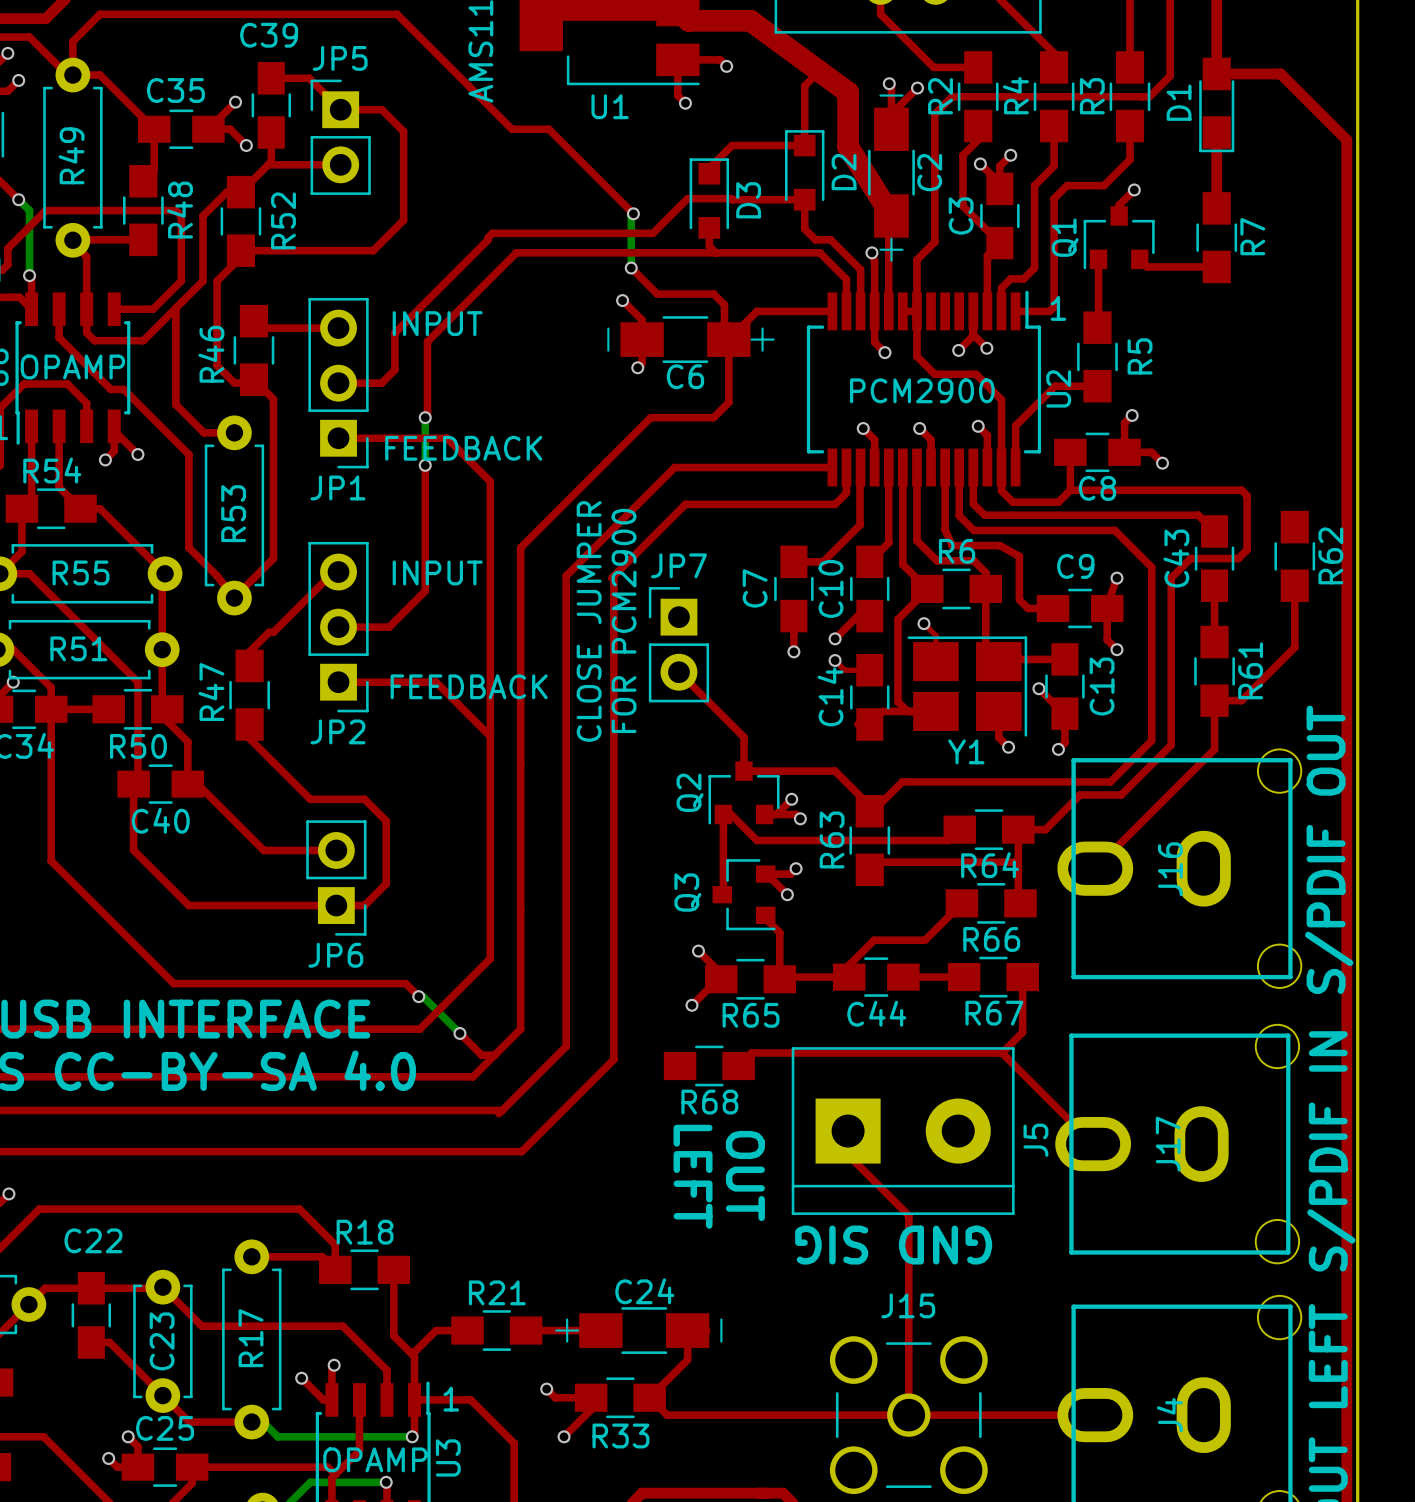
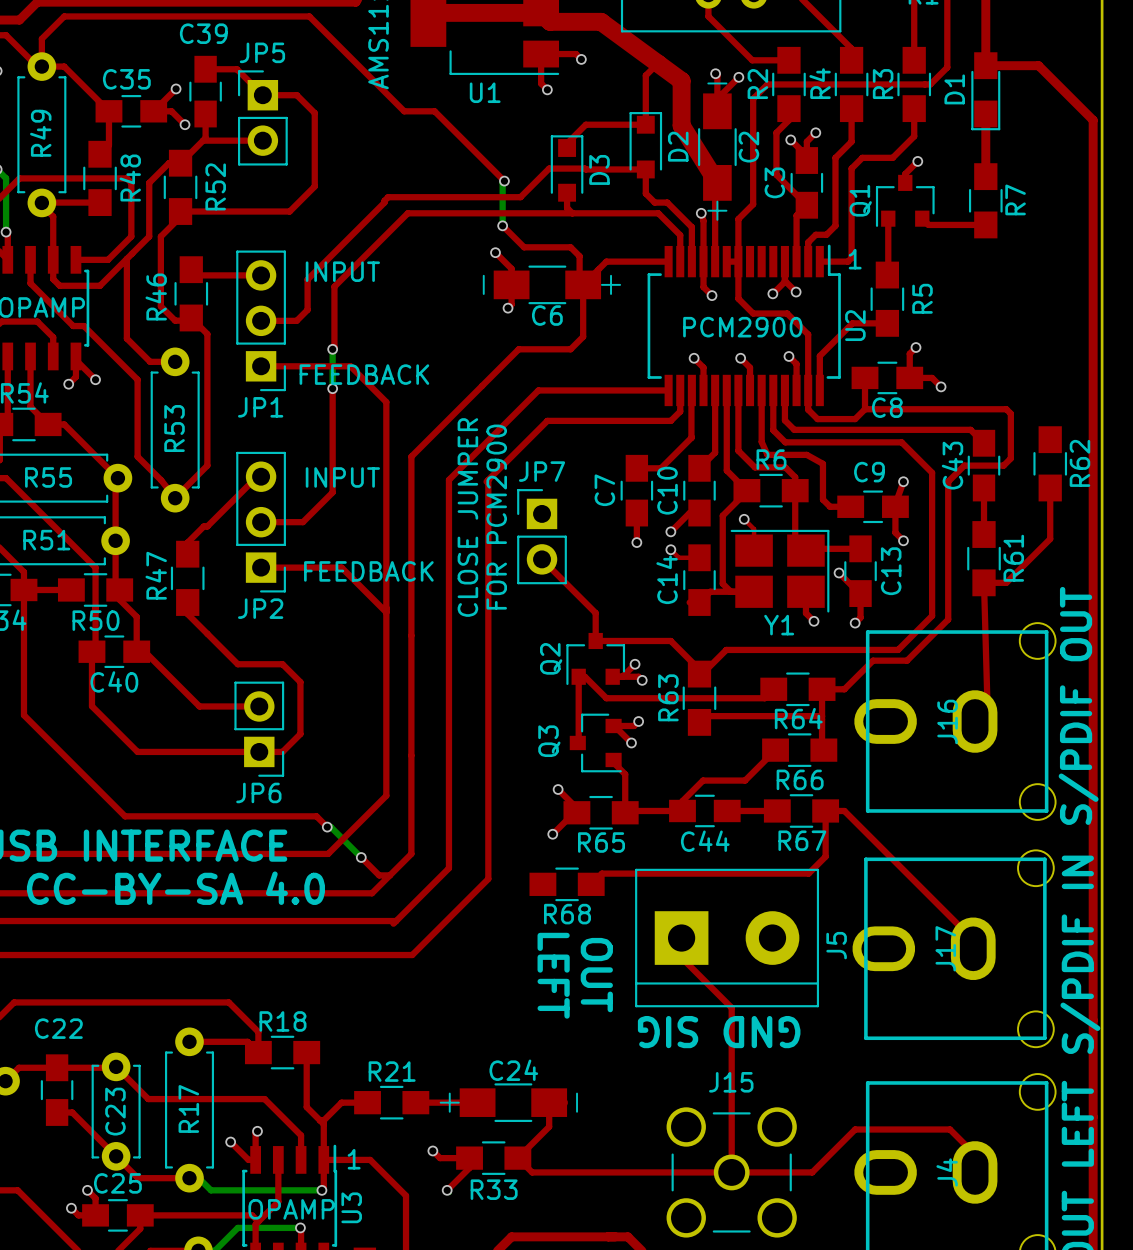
top track: (1214, 700) (1214, 749) (1095, 868) -> (984, 582) (987, 708)
top track: none -> (825, 810) (844, 810) (973, 939)
top track: (1002, 1052) (1093, 1144) -> none
top track: (1006, 1415) (1095, 1415) -> (812, 1172) (855, 1129) (950, 1129) (975, 1154)

